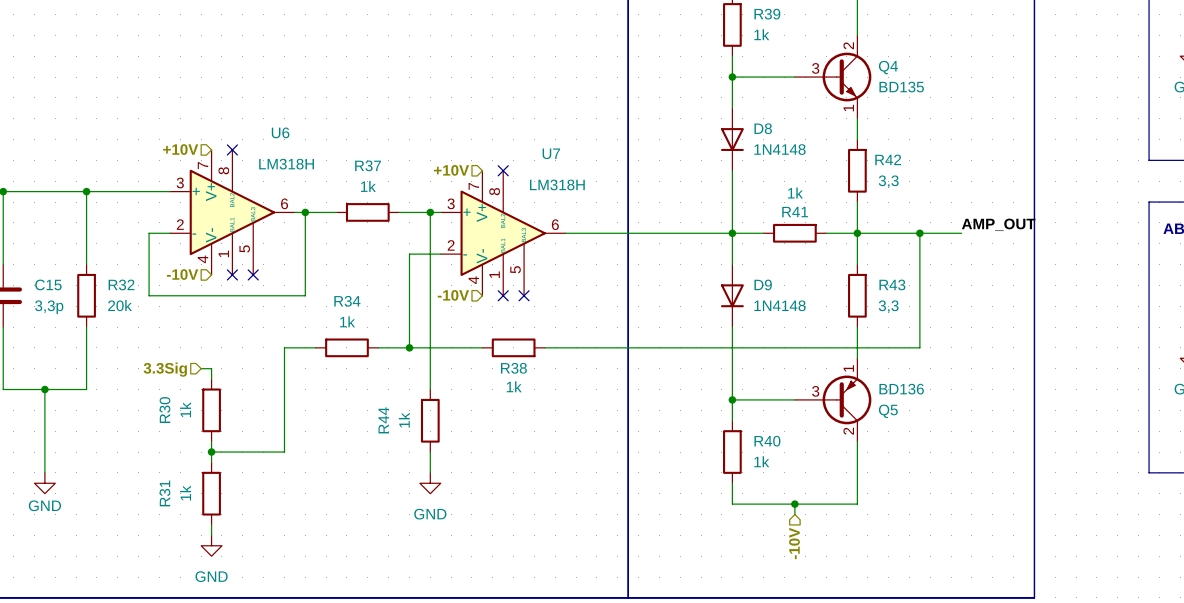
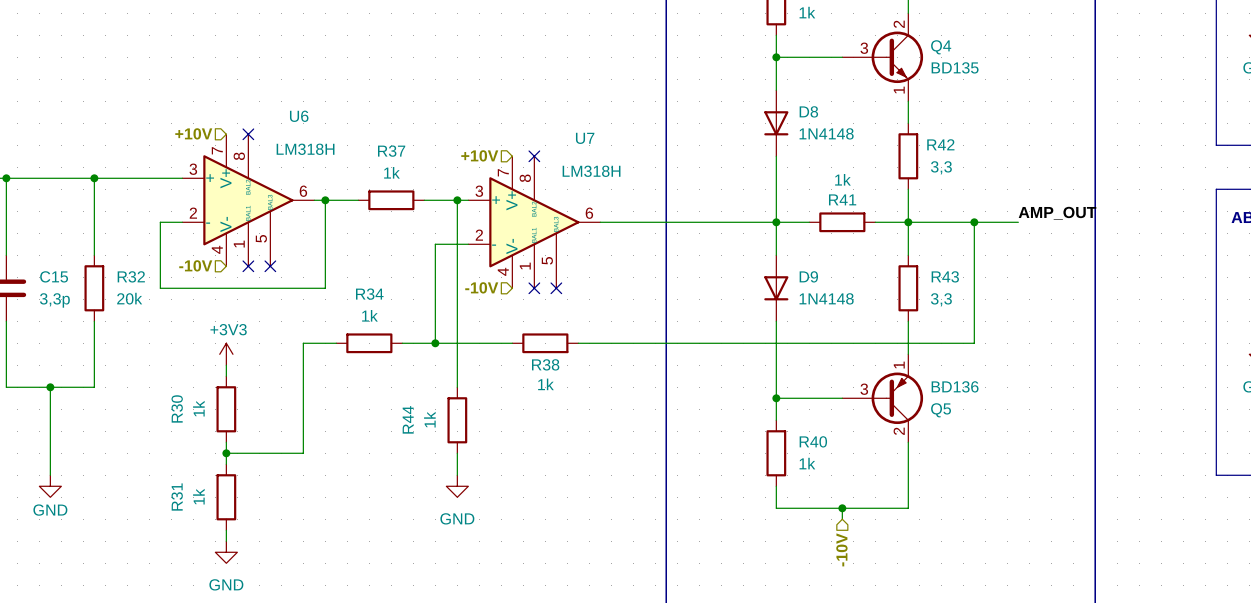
power symbol: none -> +3V3 (226, 354)
wire: (201, 368) (211, 368) -> none
hierarchical label: 3.3Sig (165, 369) -> none

